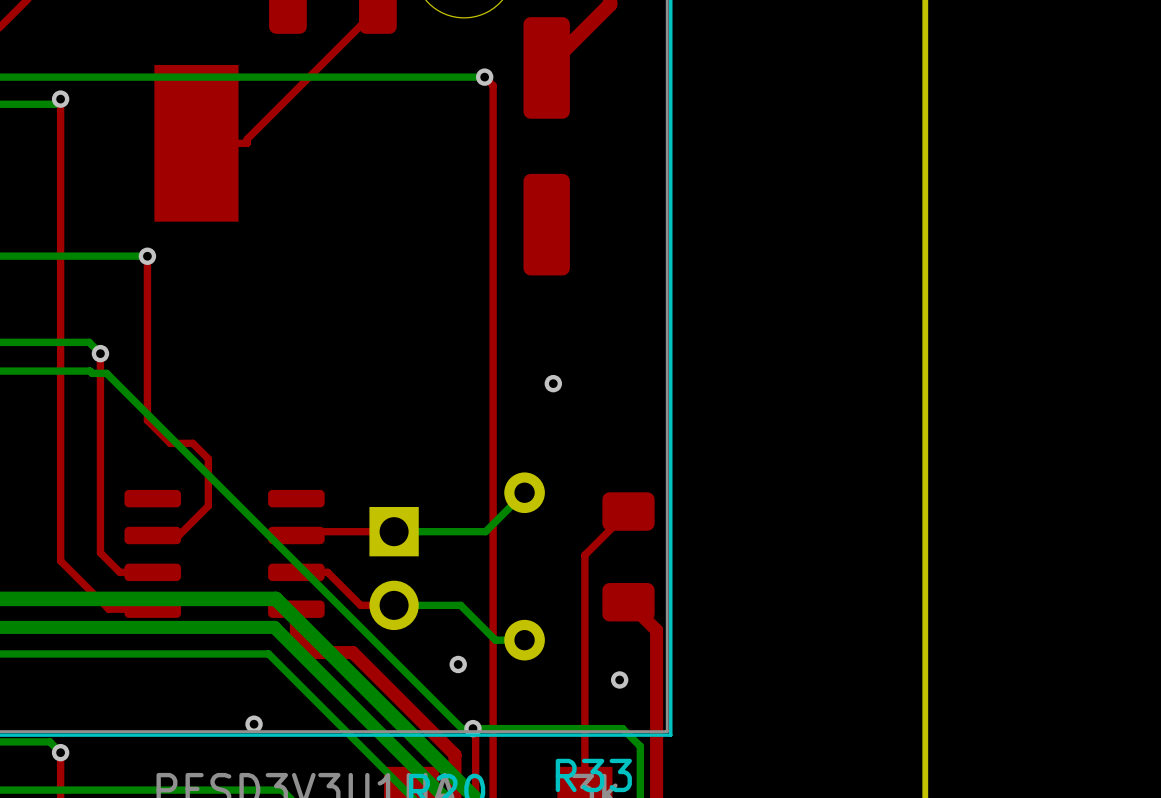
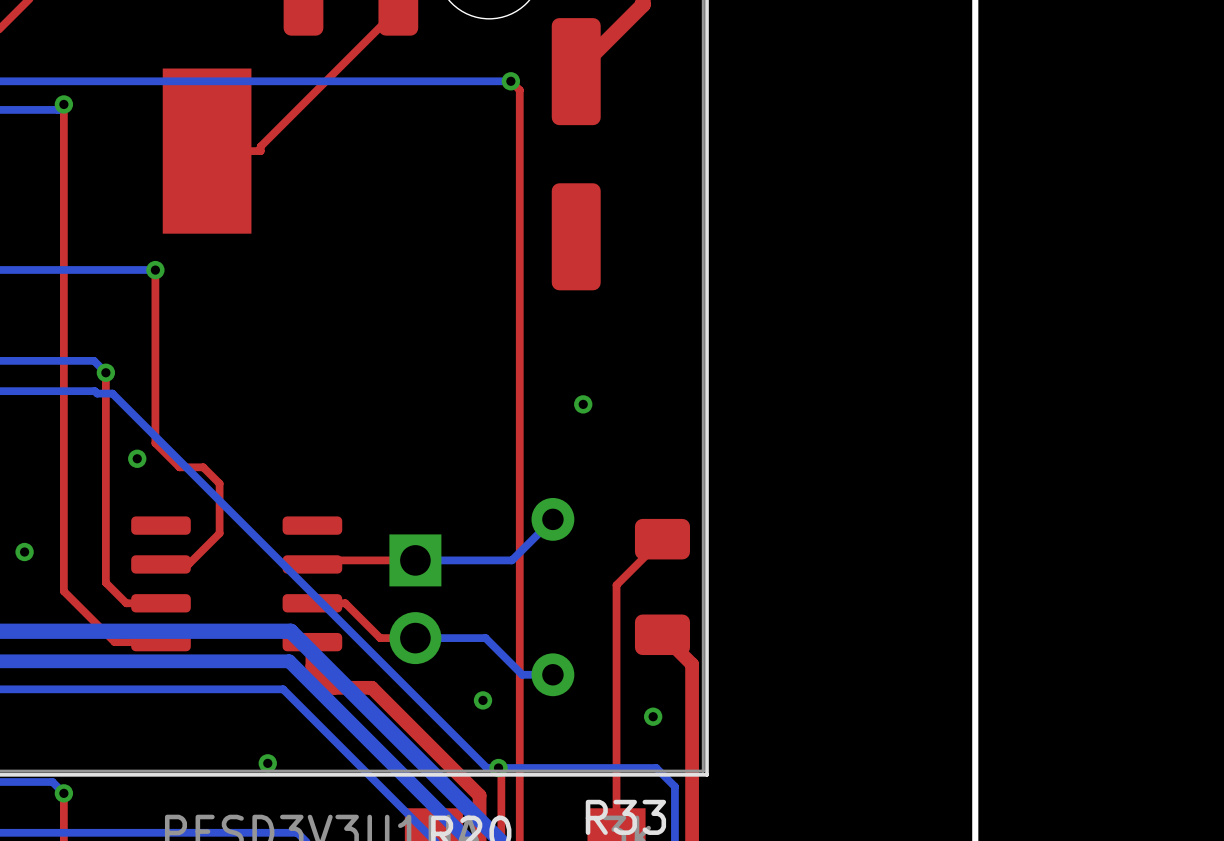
via: none -> (137, 458)
via: none -> (24, 552)

